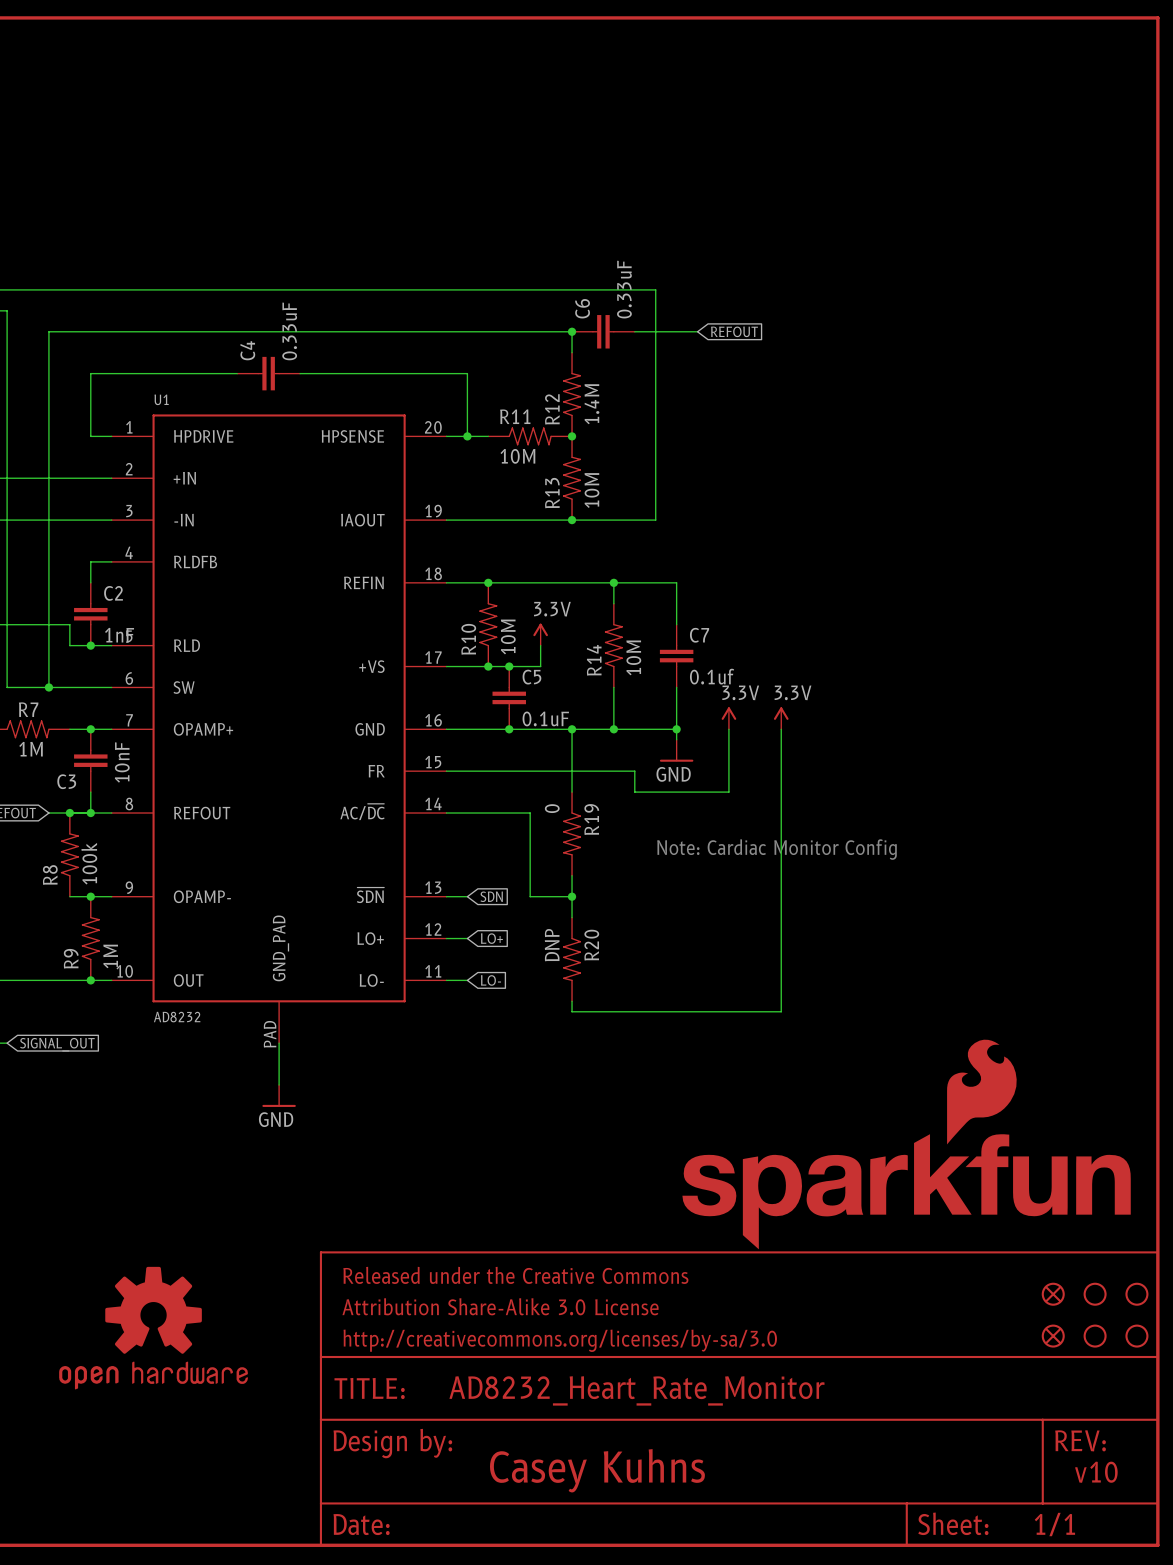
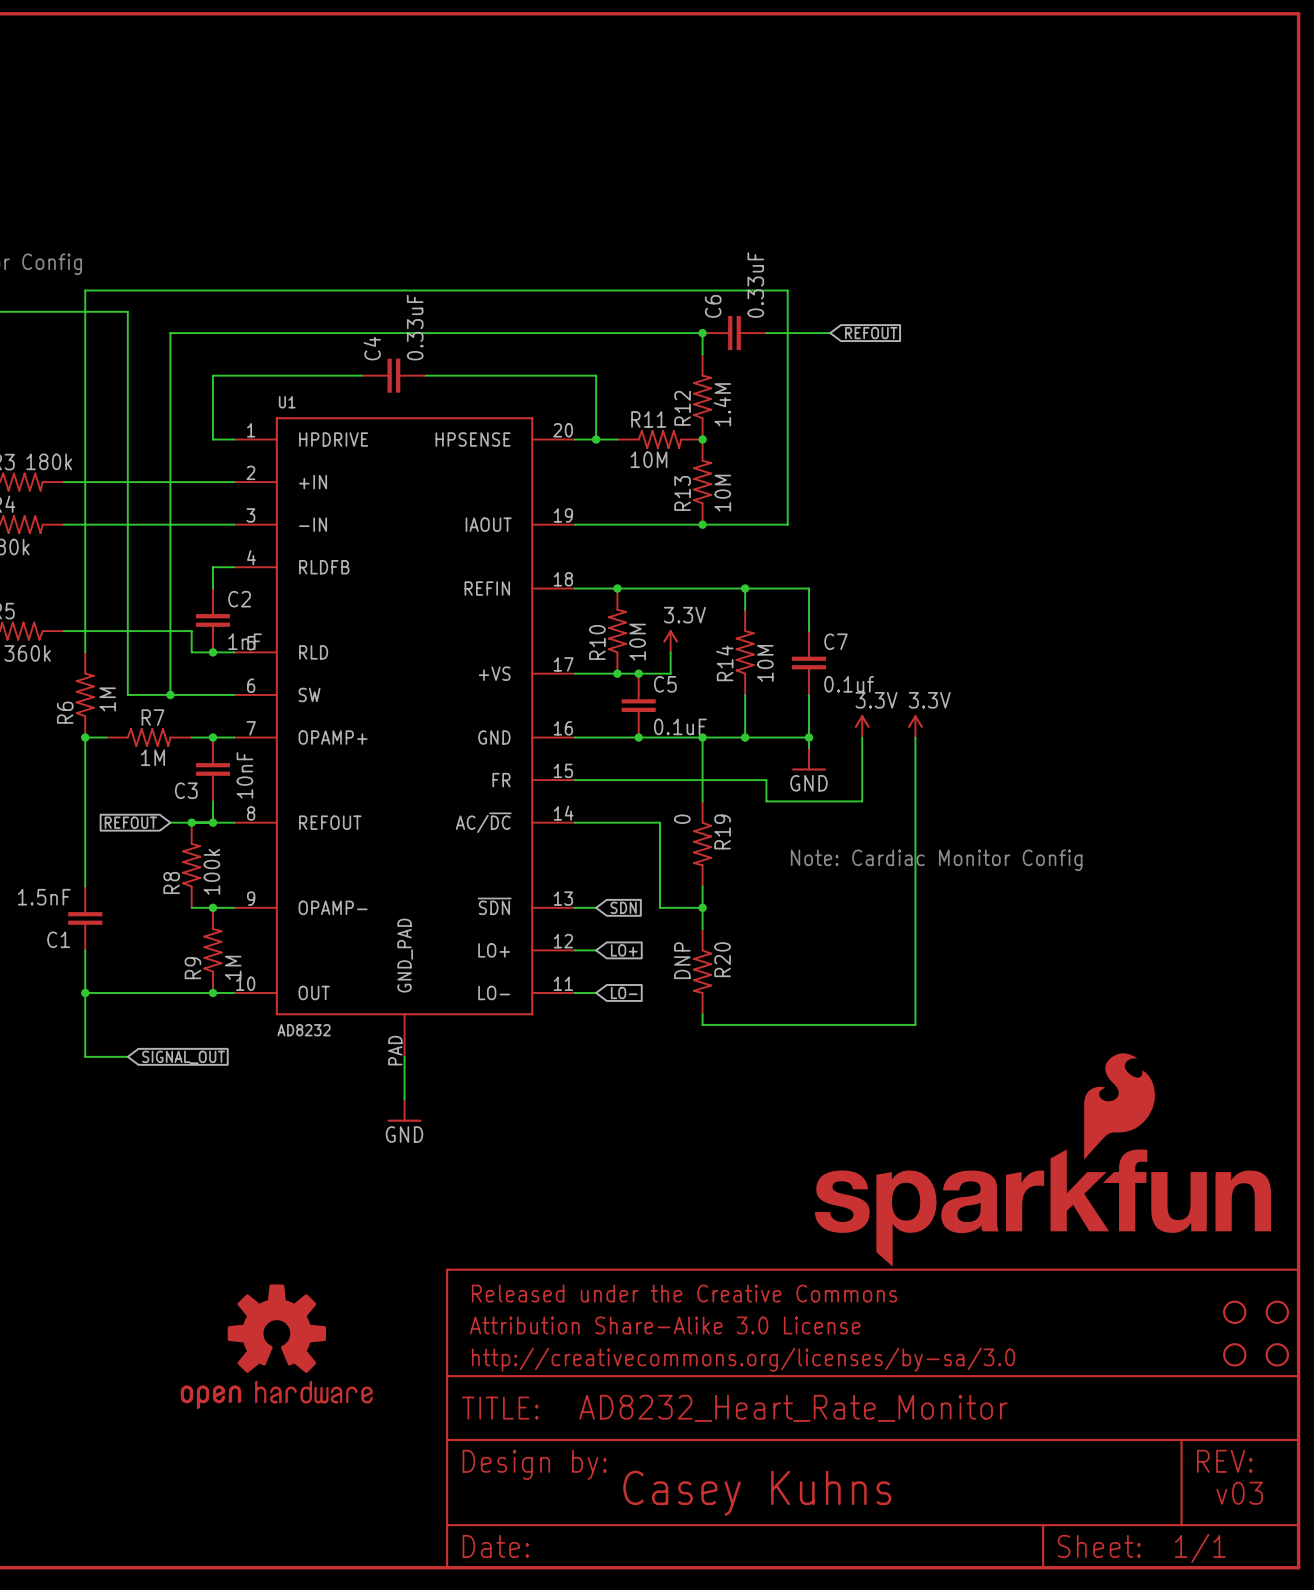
part: (1053, 1294) -> none
part: (1053, 1336) -> none
text: v10 (1096, 1472) -> v03 (1239, 1493)

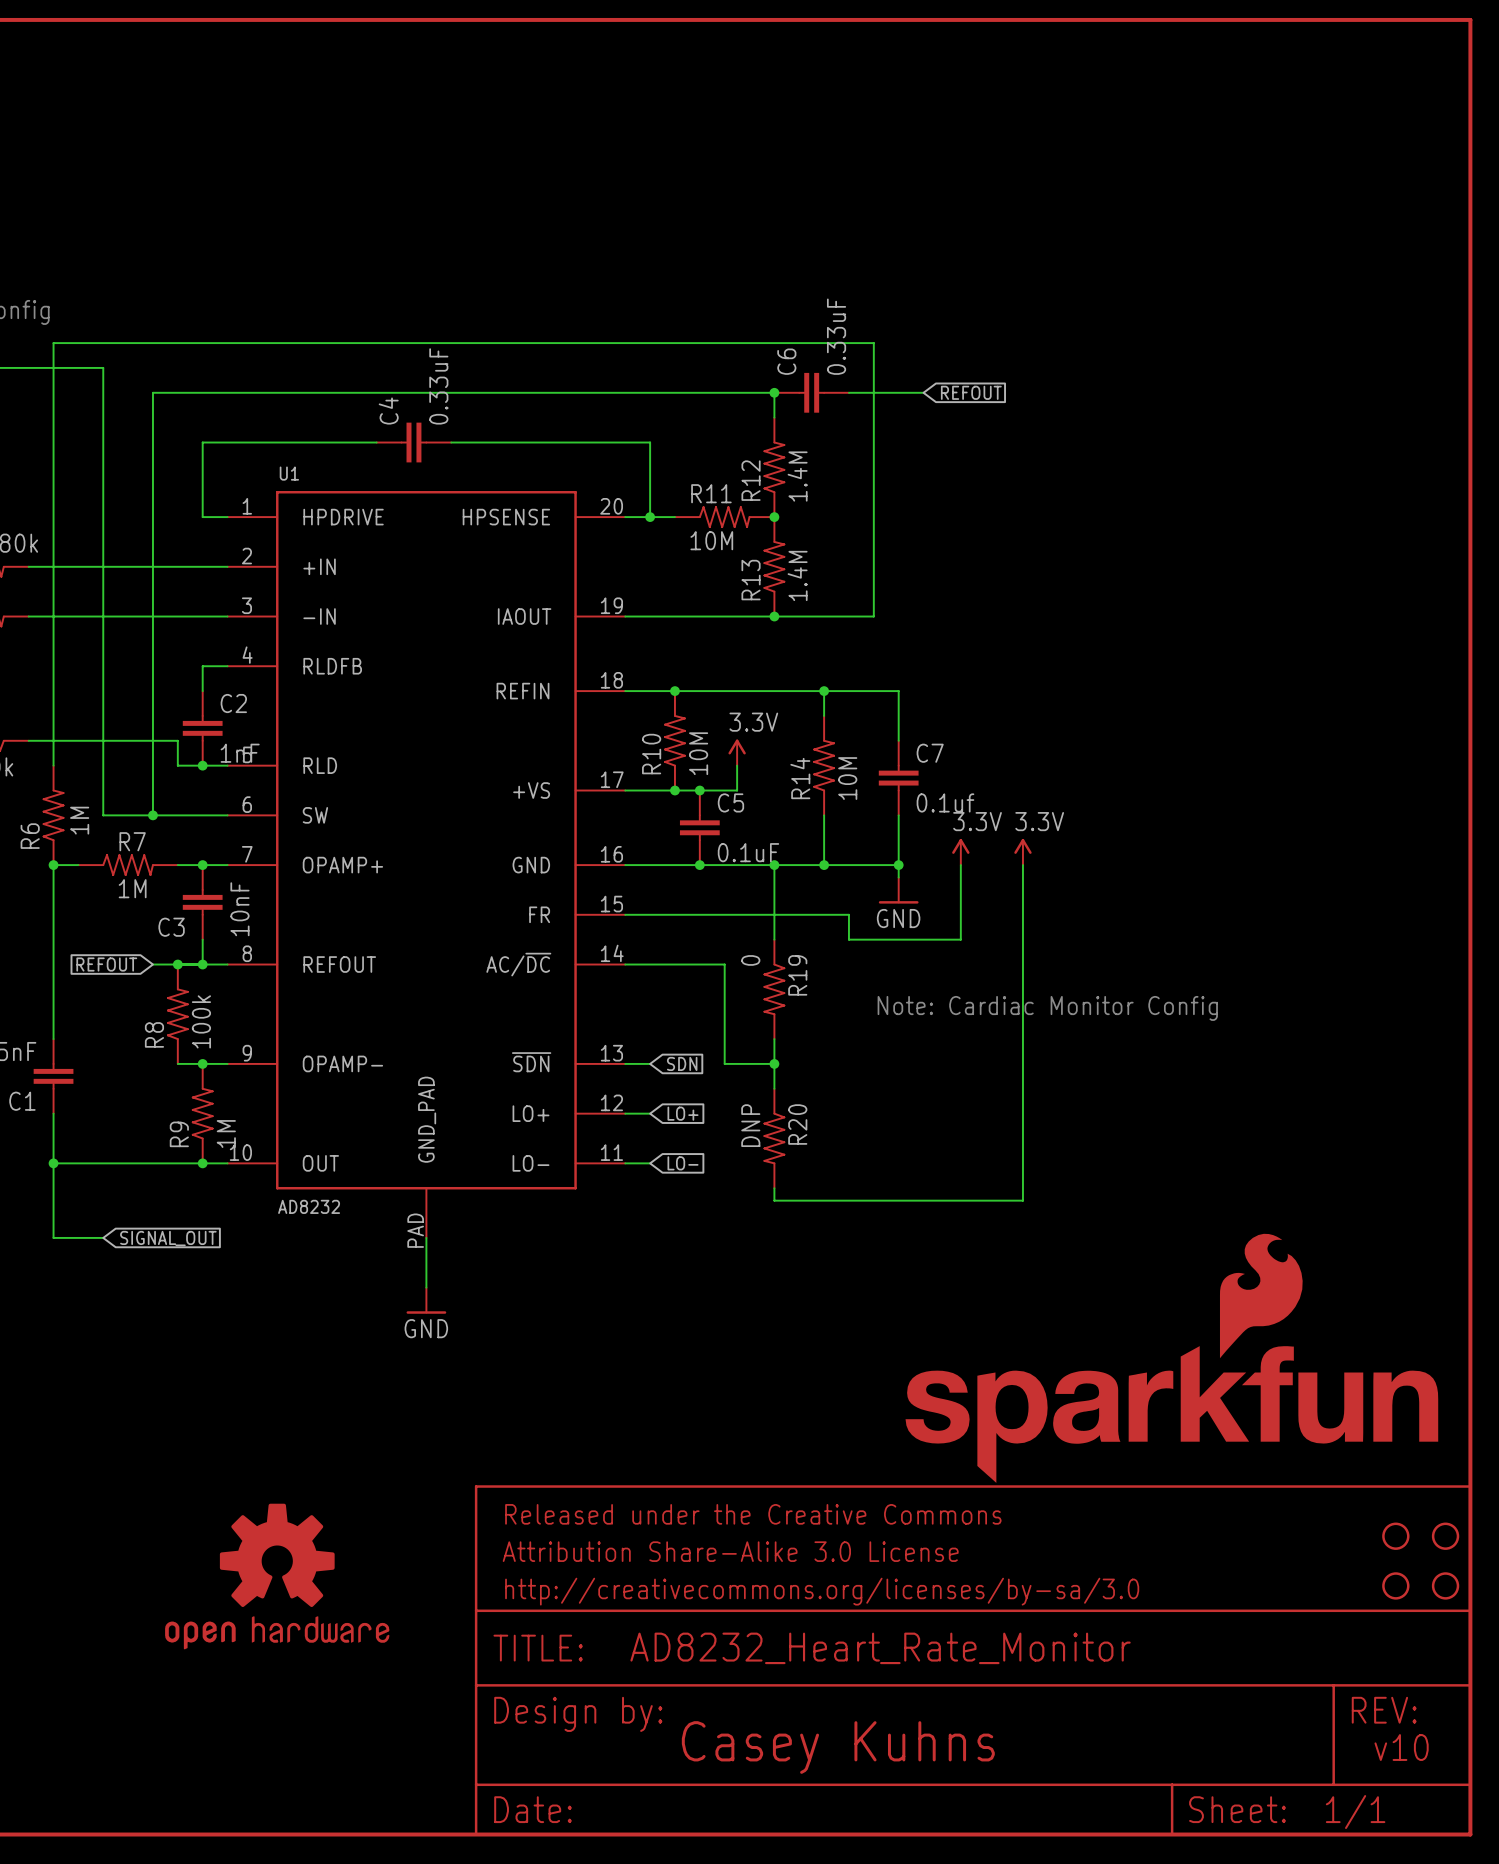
R13 value: 10M (722, 493) -> 1.4M (797, 575)
text: v03 (1239, 1493) -> v10 (1401, 1747)

